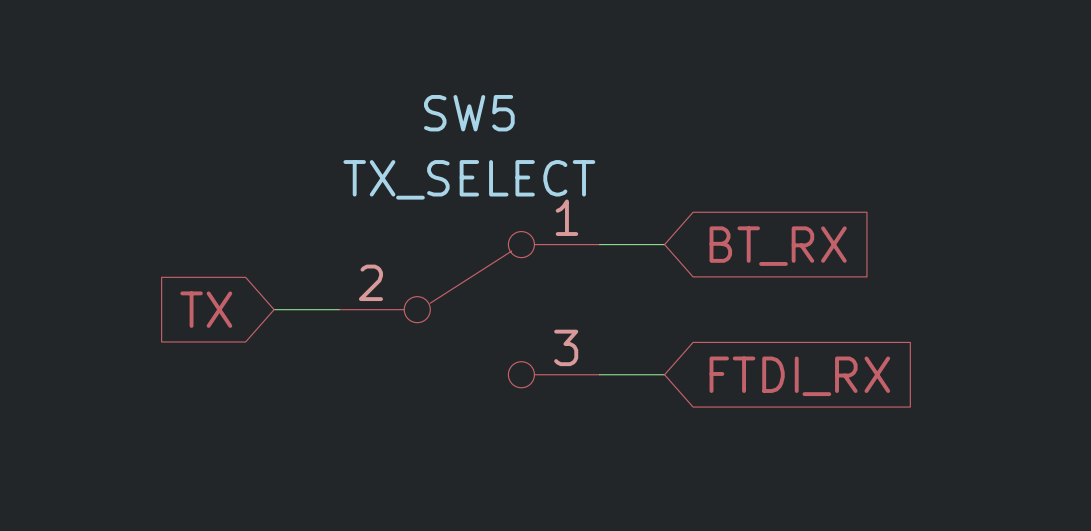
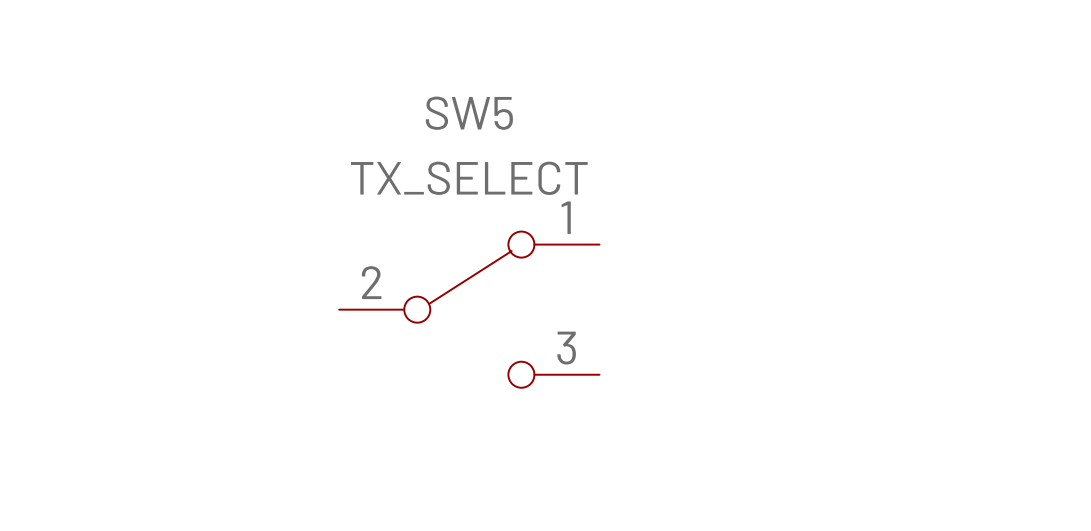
wire: (599, 244) (664, 244) -> none
global label: BT_RX (778, 246) -> none
global label: TX (206, 309) -> none
wire: (274, 309) (339, 309) -> none
wire: (599, 374) (664, 374) -> none
global label: FTDI_RX (799, 376) -> none

